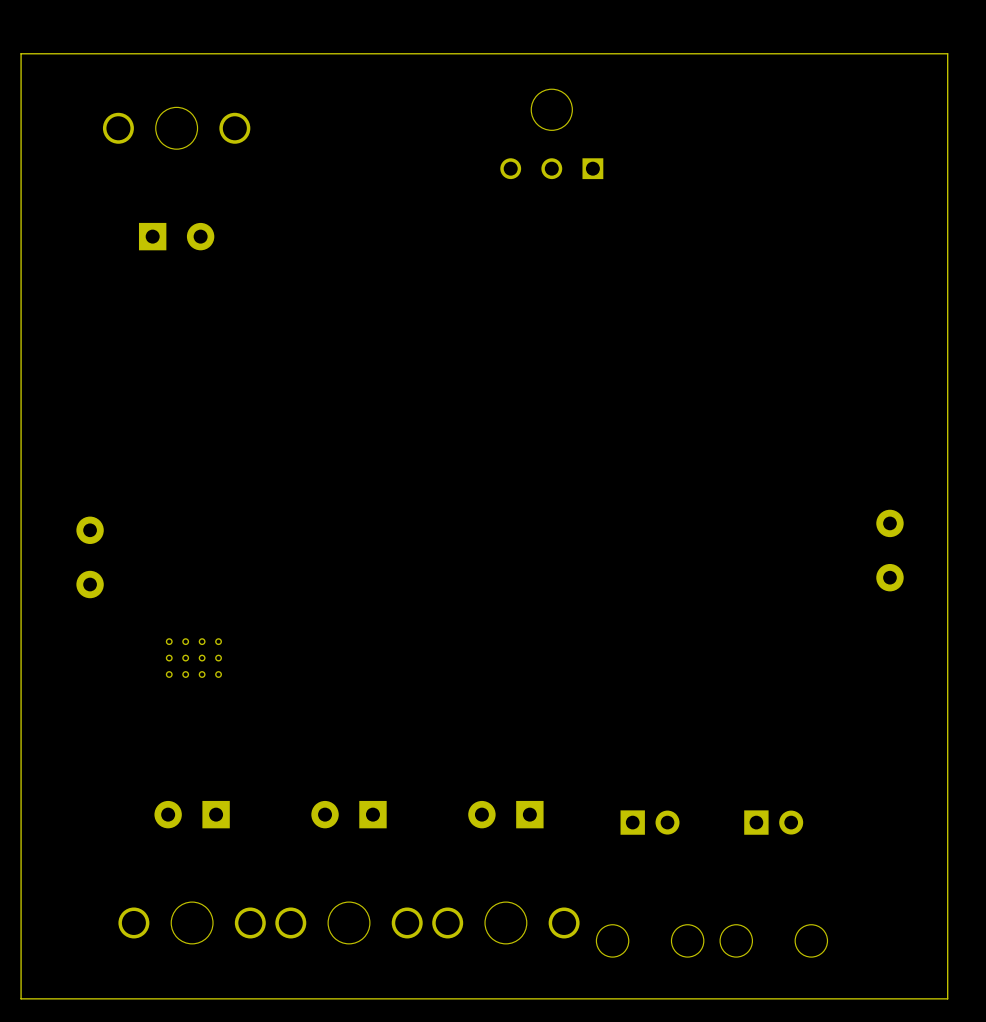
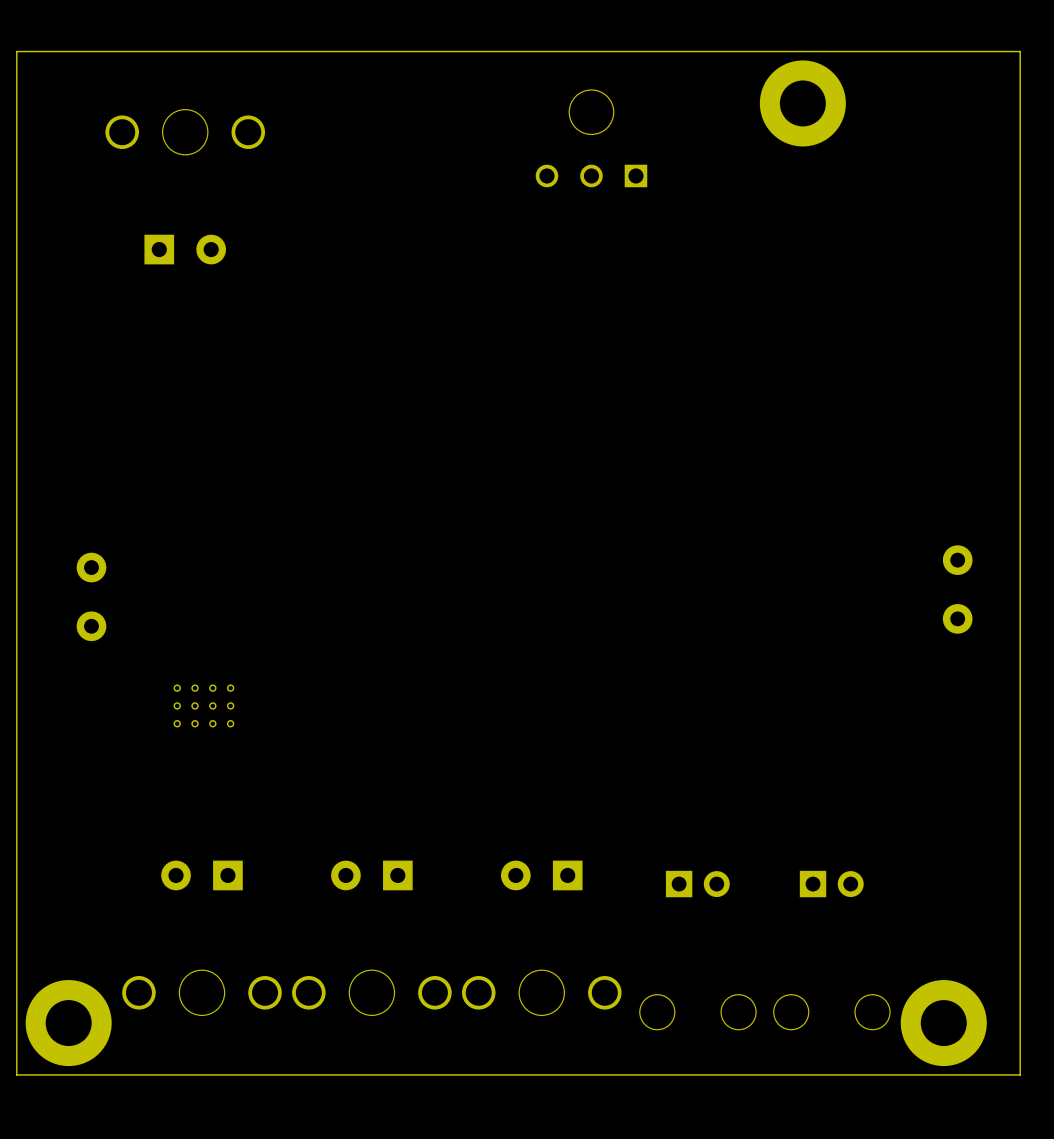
part: none -> (802, 103)
part: none -> (68, 1023)
part: none -> (943, 1023)

